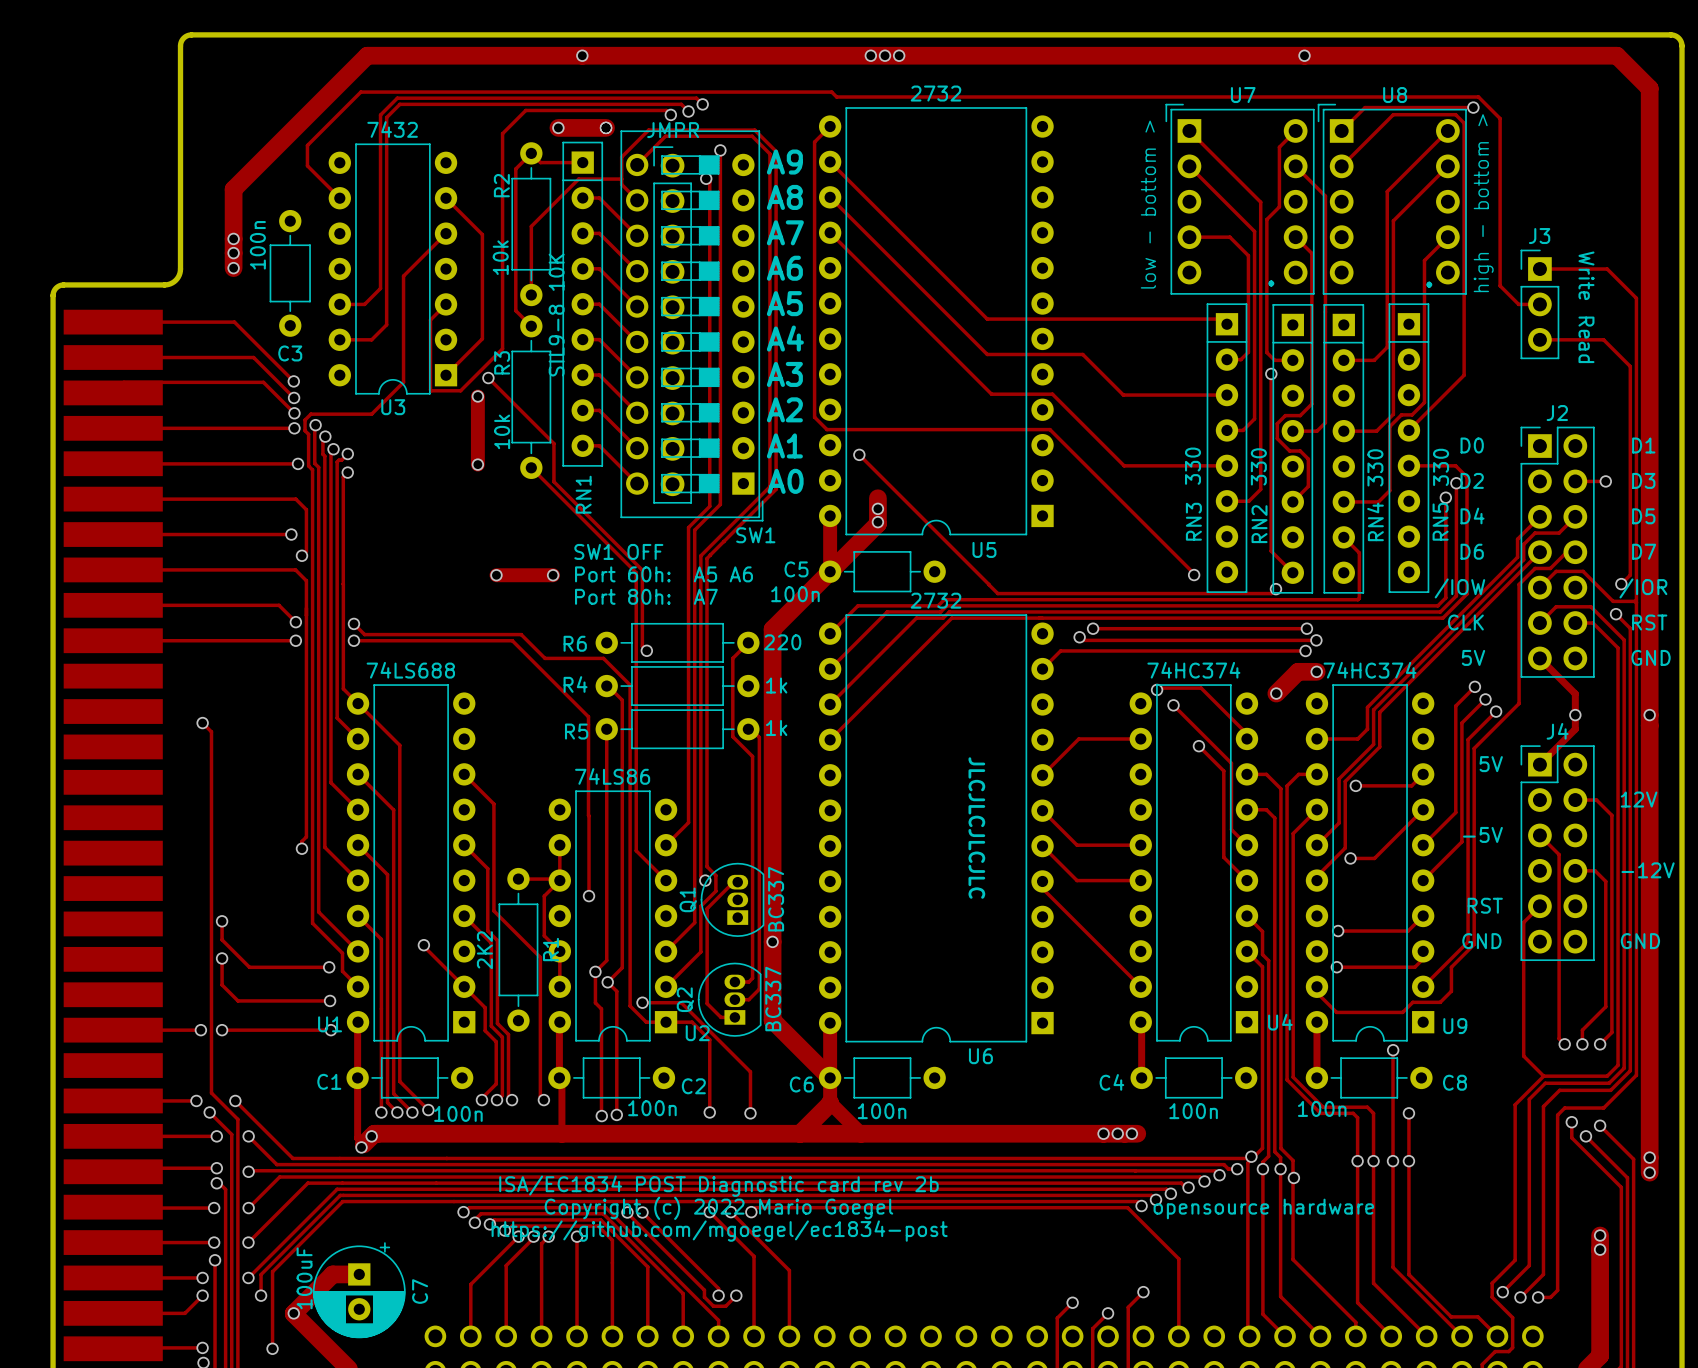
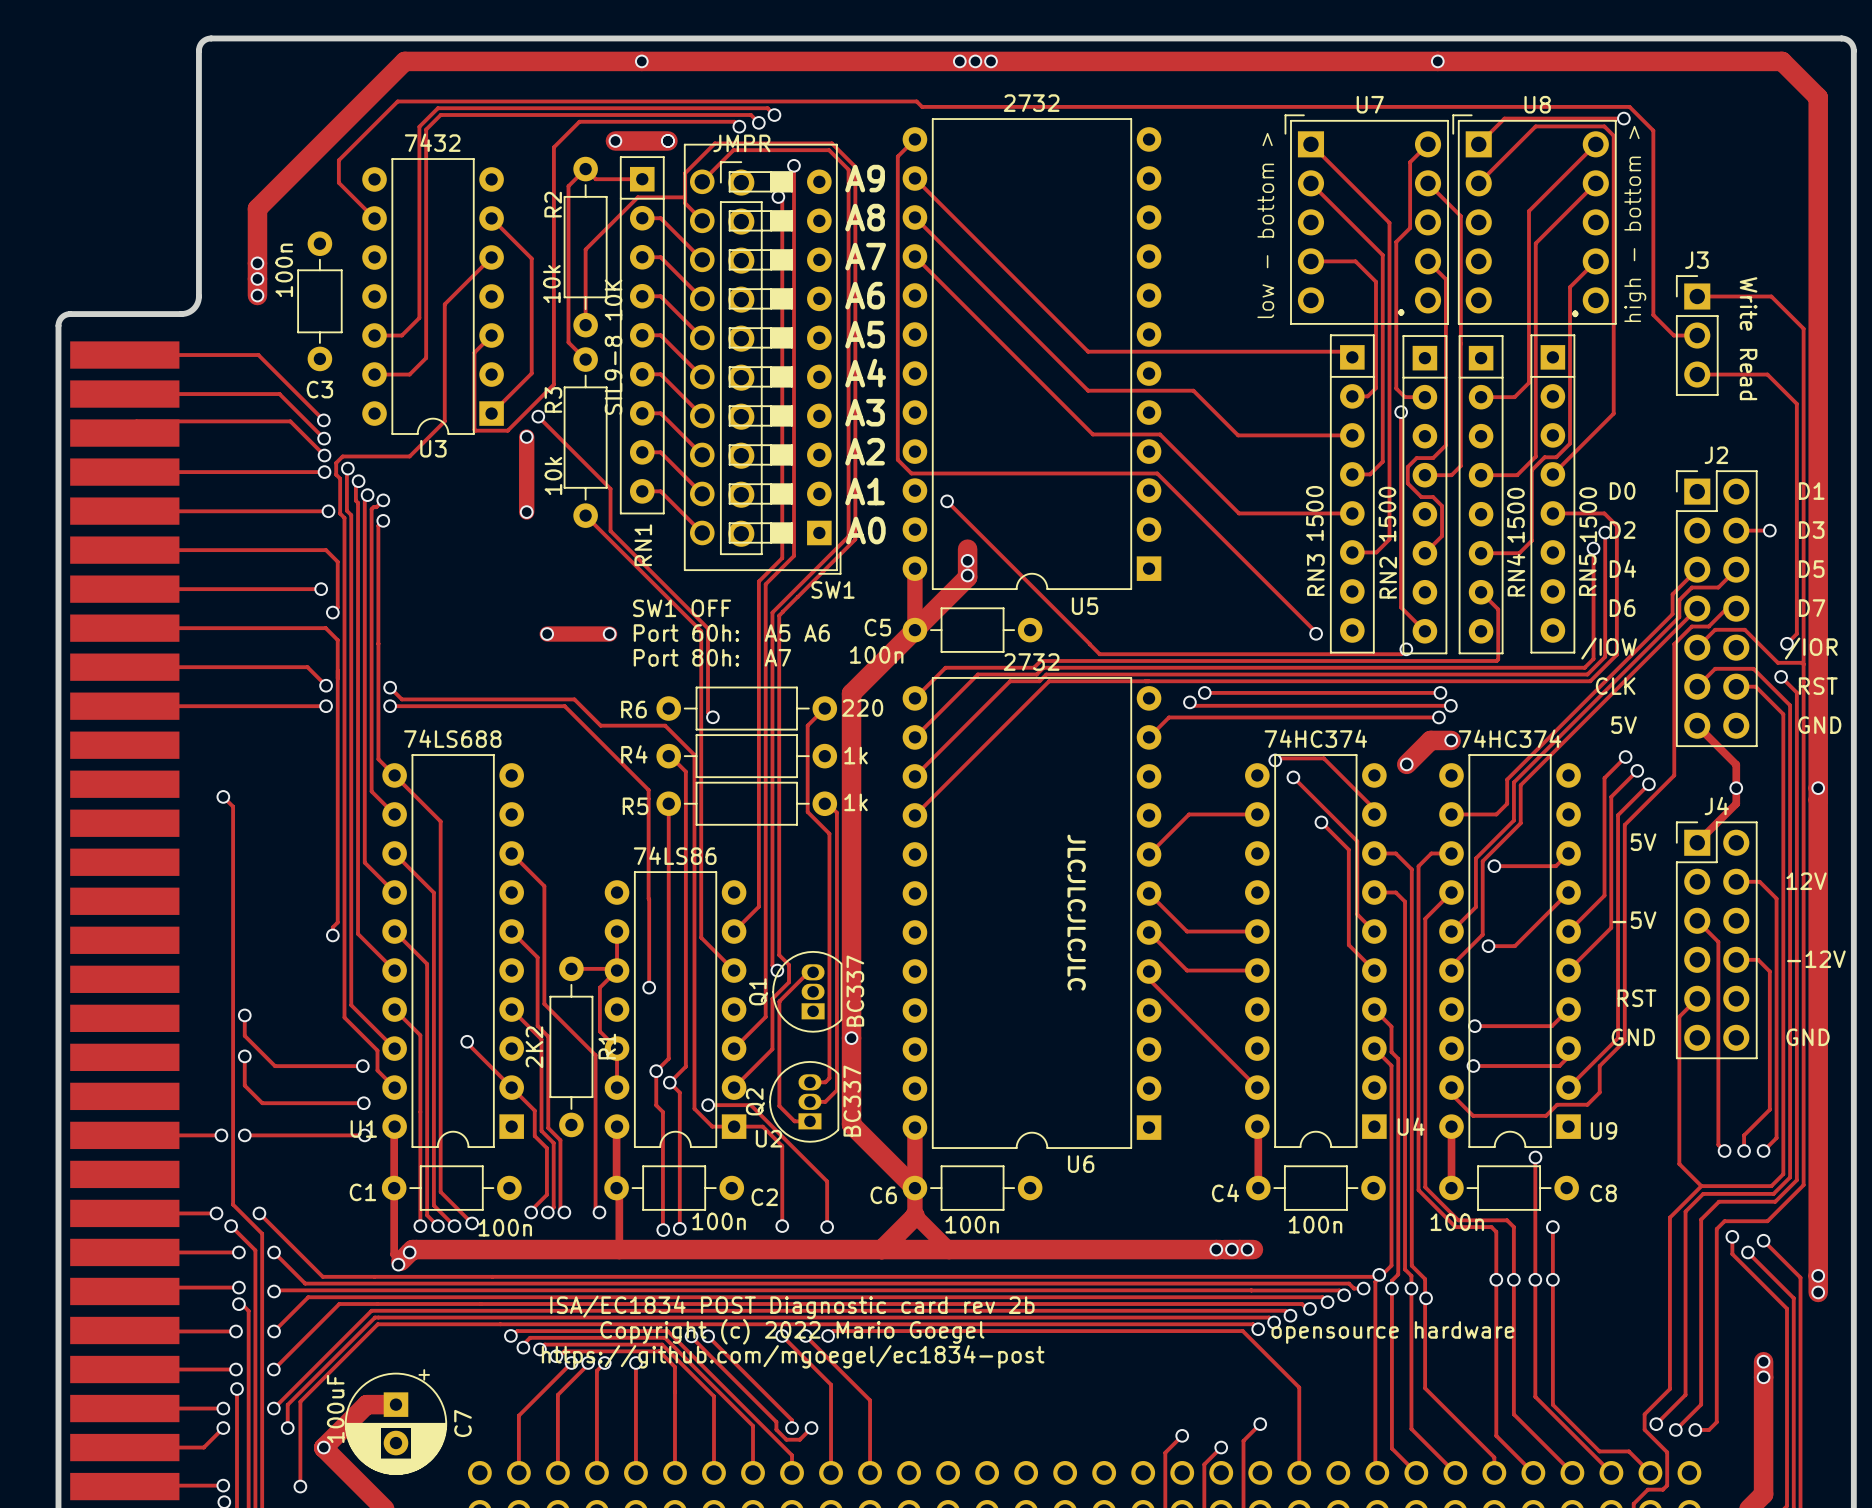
RN3 value: 330 (1193, 466) -> 1500 (1314, 513)
RN2 value: 330 (1258, 466) -> 1500 (1387, 514)
RN4 value: 330 (1375, 467) -> 1500 (1515, 515)
RN5 value: 330 (1441, 467) -> 1500 (1588, 514)

